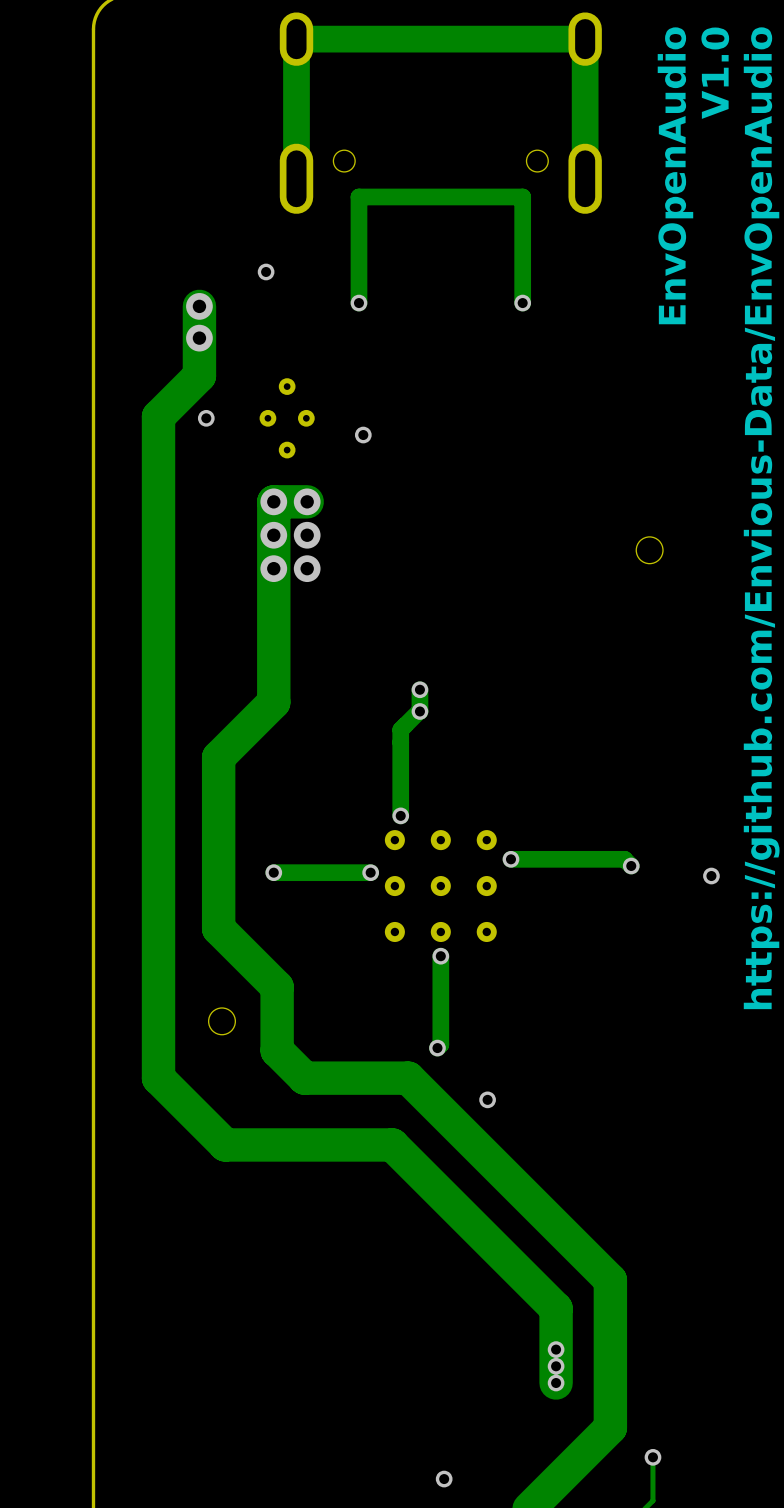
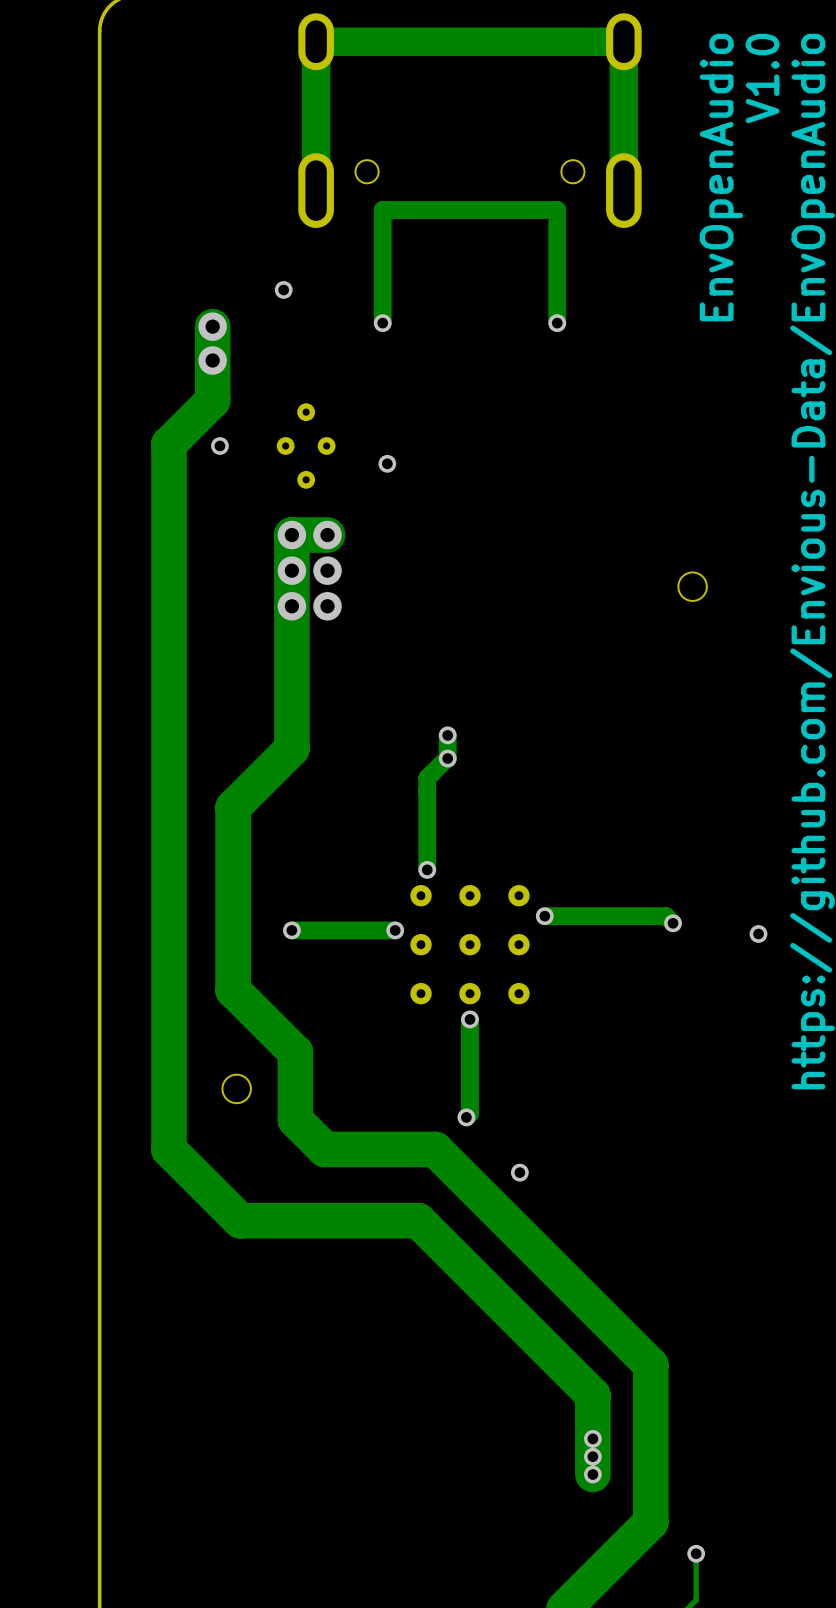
via: (444, 1479) -> none

